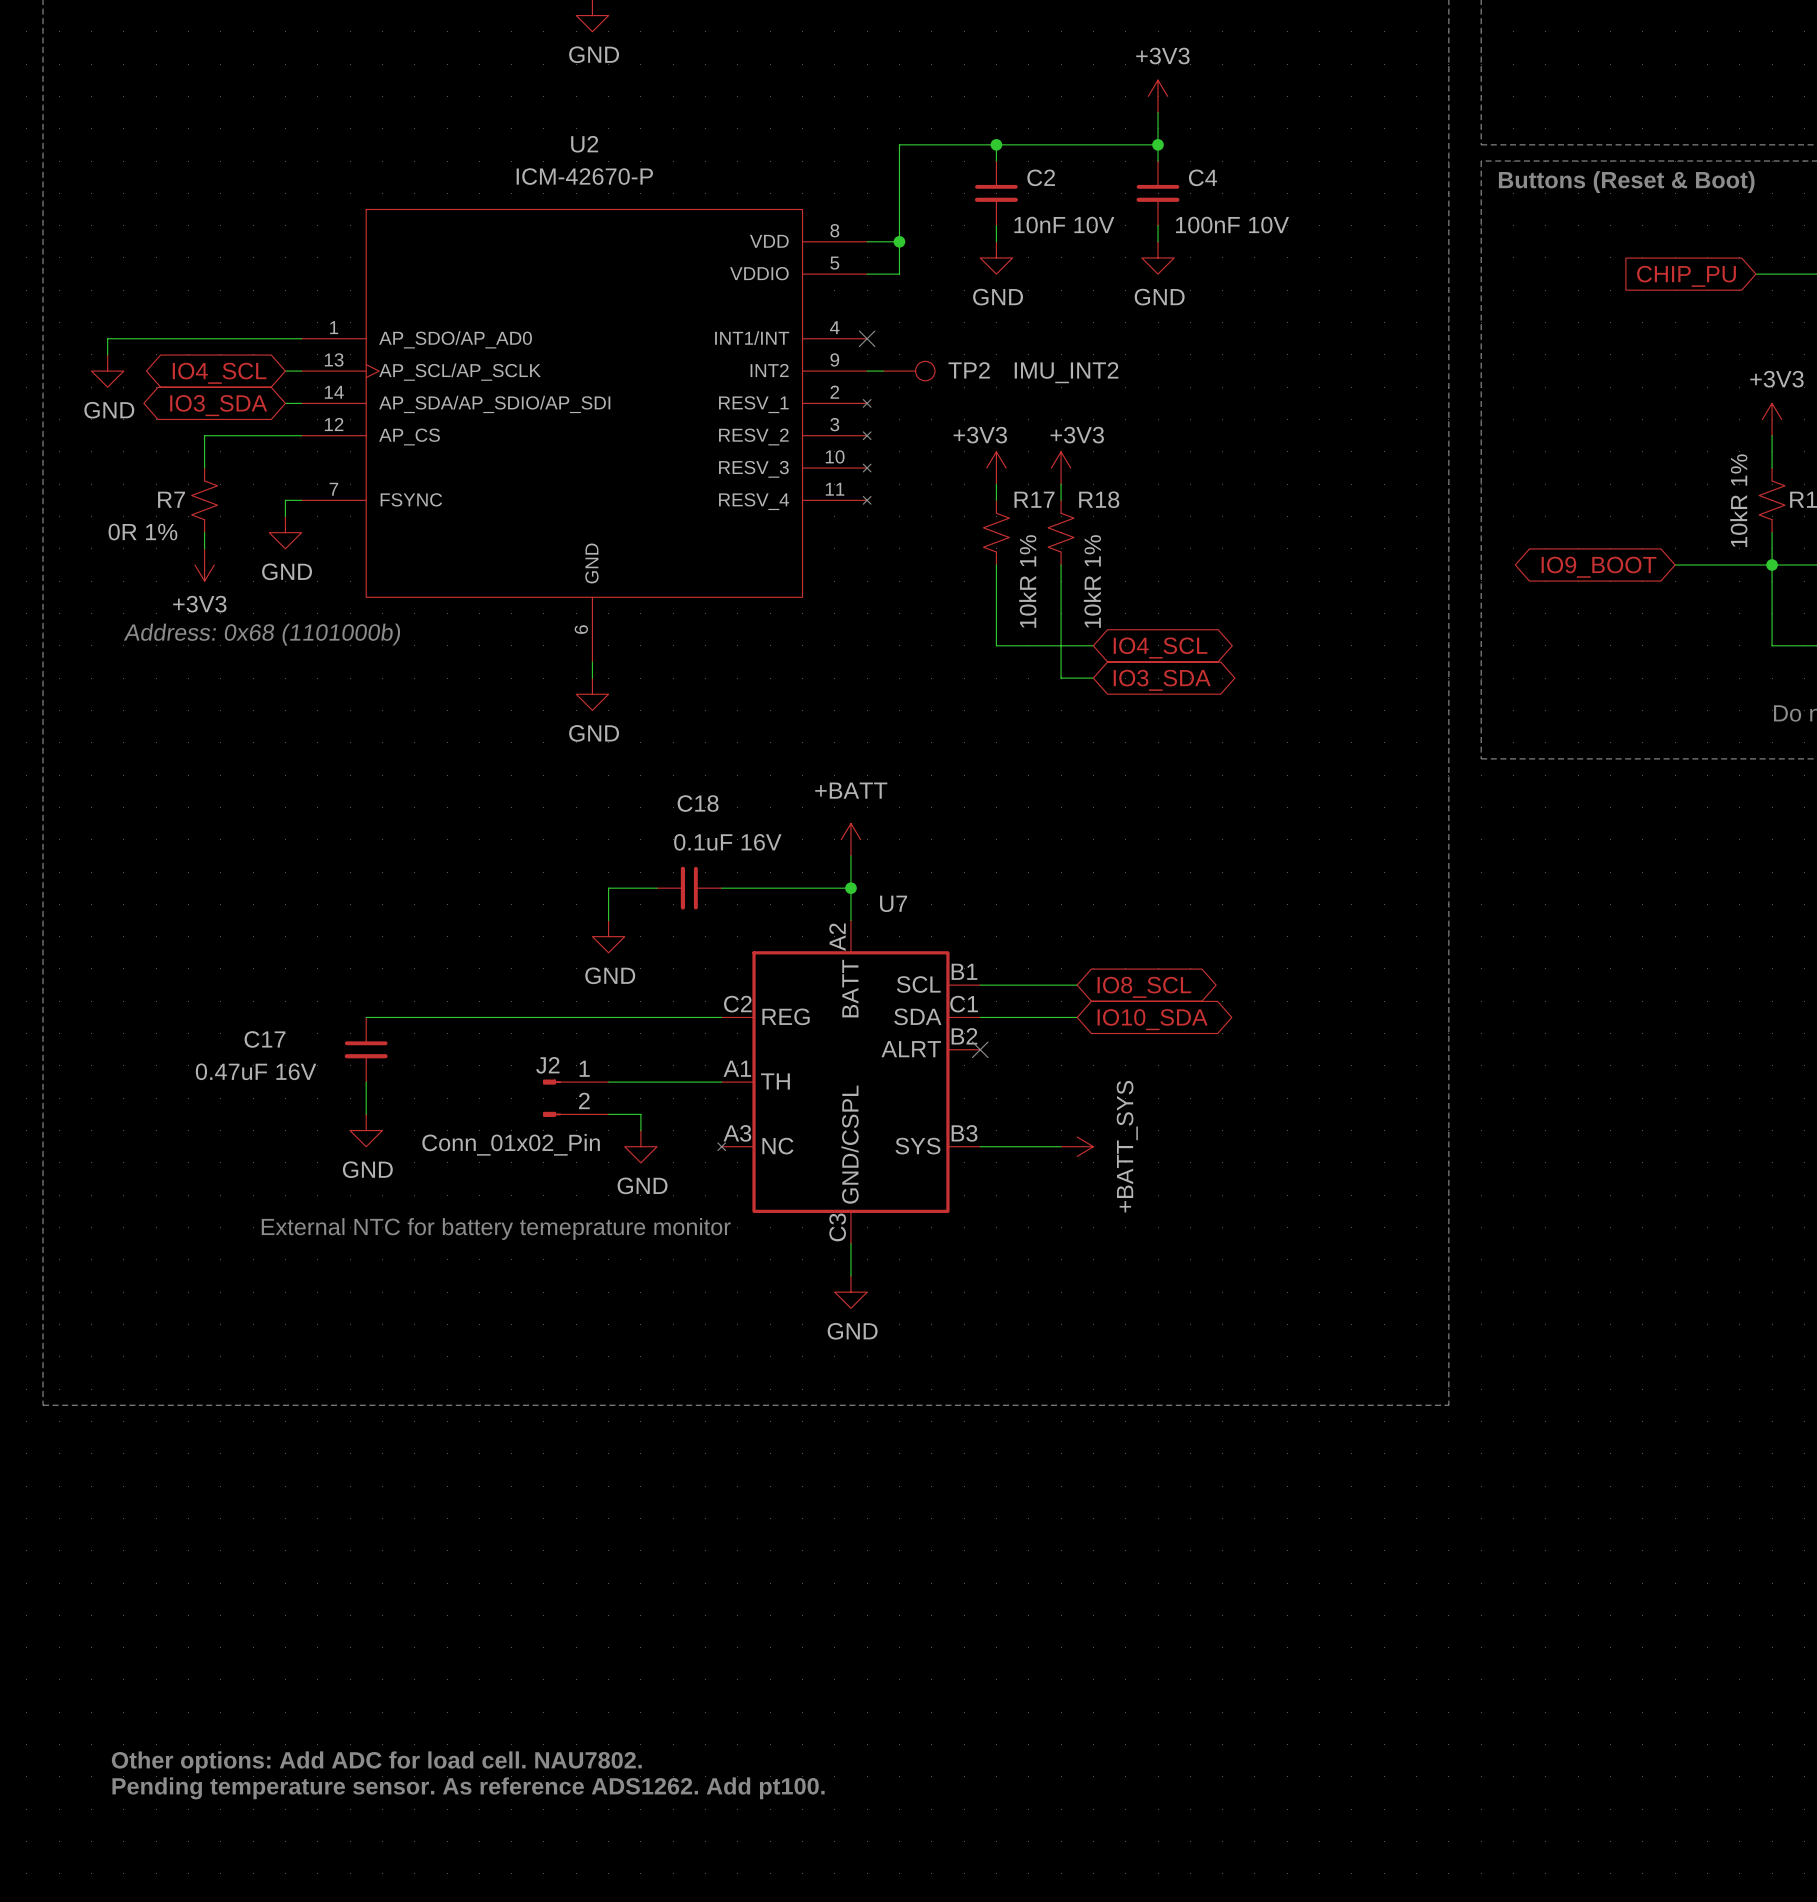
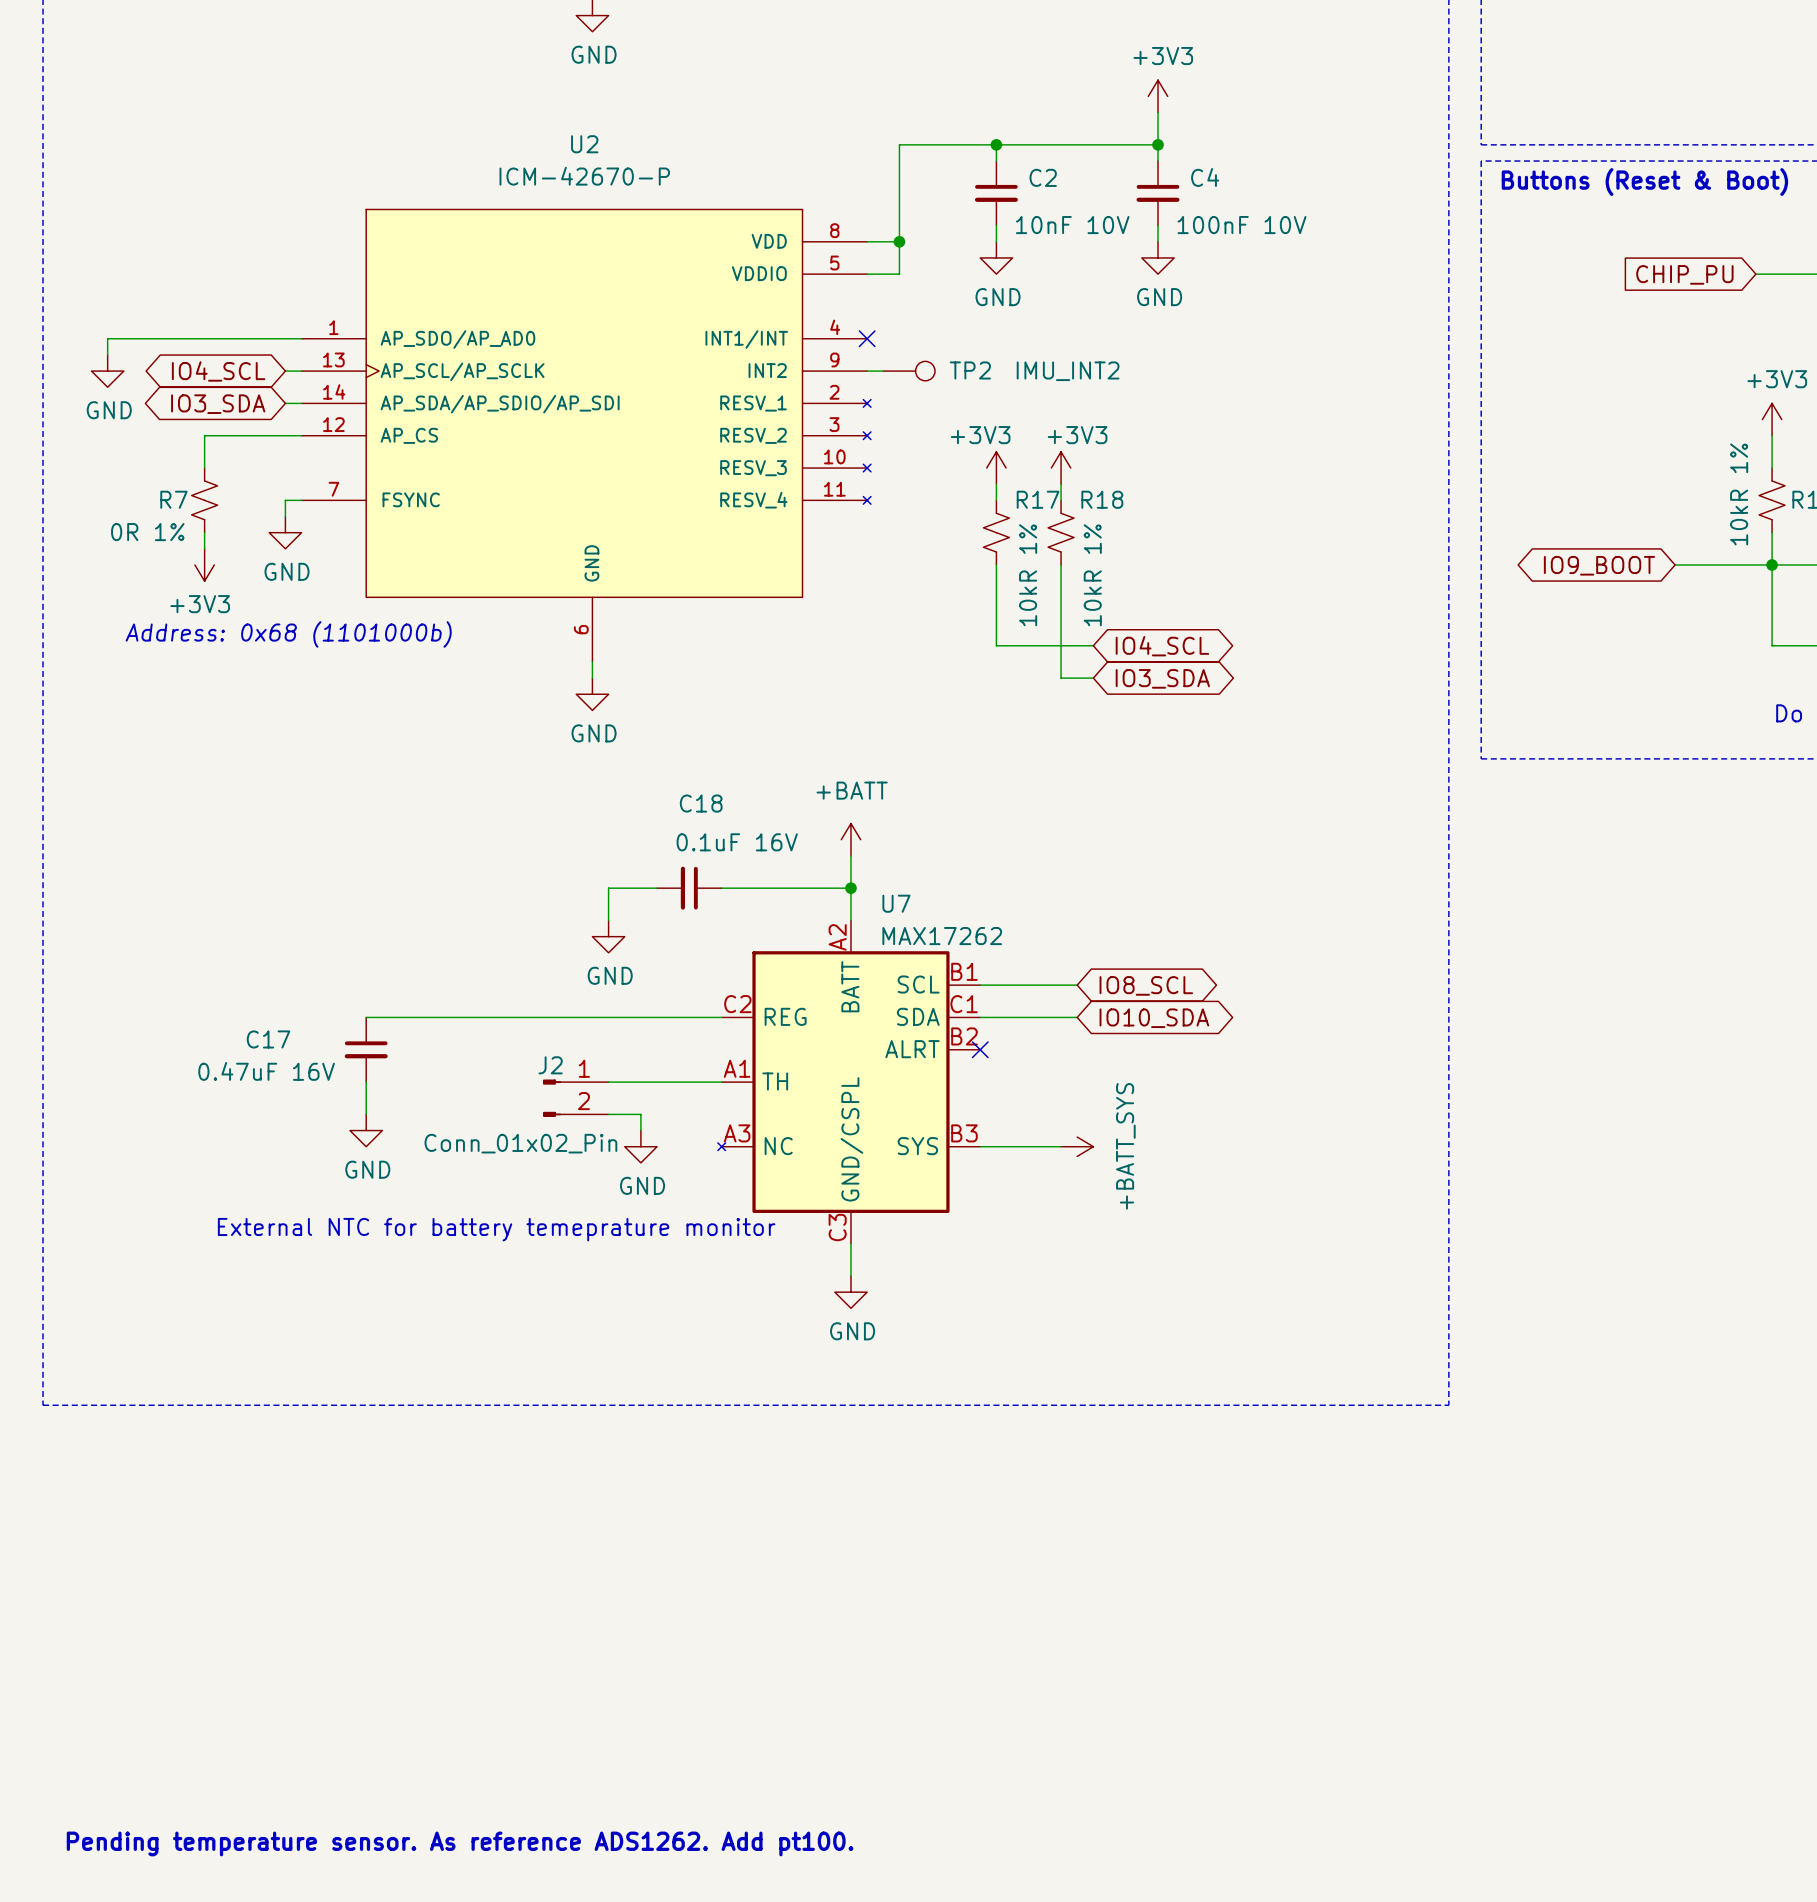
U7 value: none -> MAX17262 (942, 936)
text: Other options: Add ADC for load cell. NAU7802. (376, 1762) -> none
text position: Pending temperature sensor. As reference ADS1262. Add pt100. (468, 1788) -> Pending temperature sensor. As reference ADS1262. Add pt100. (460, 1843)

